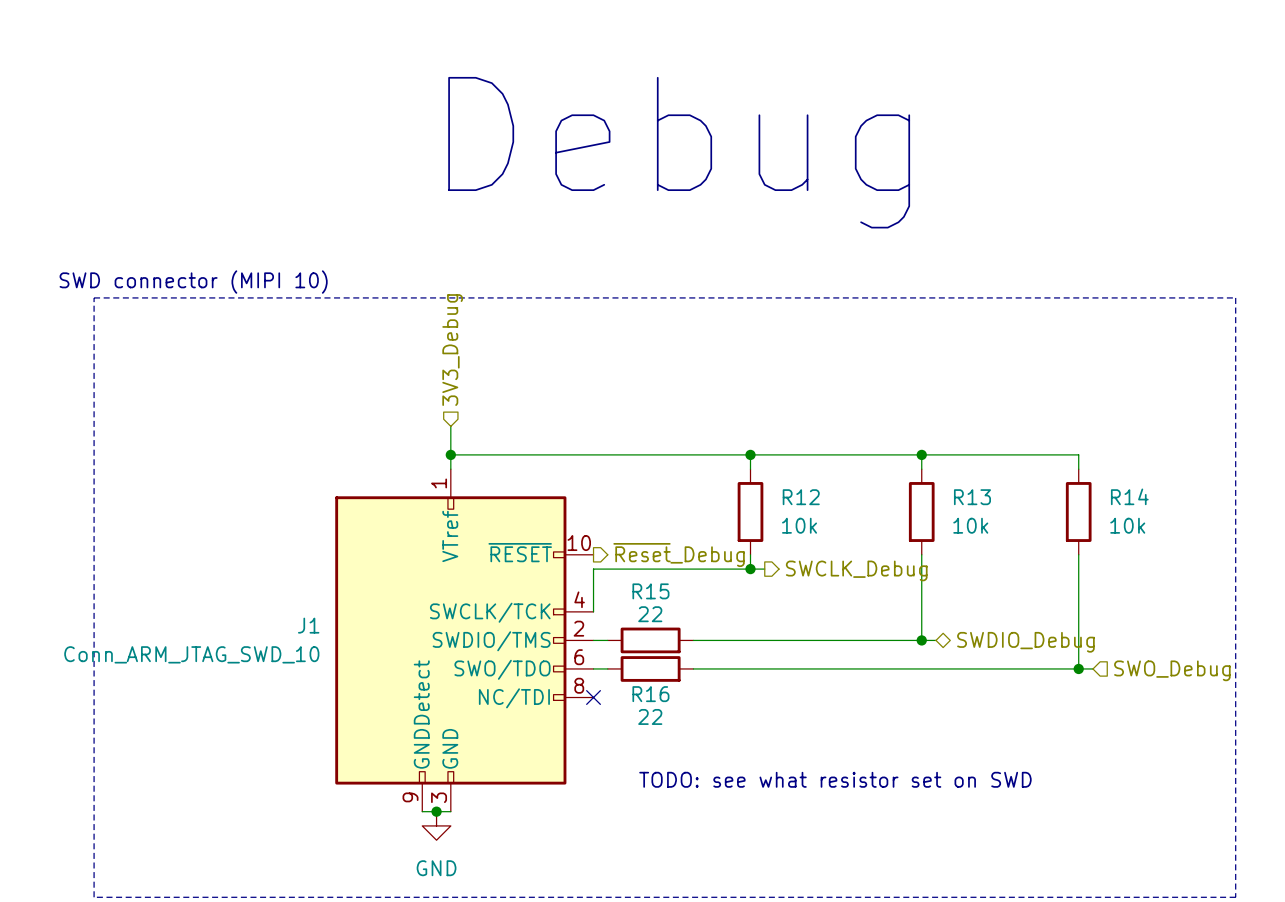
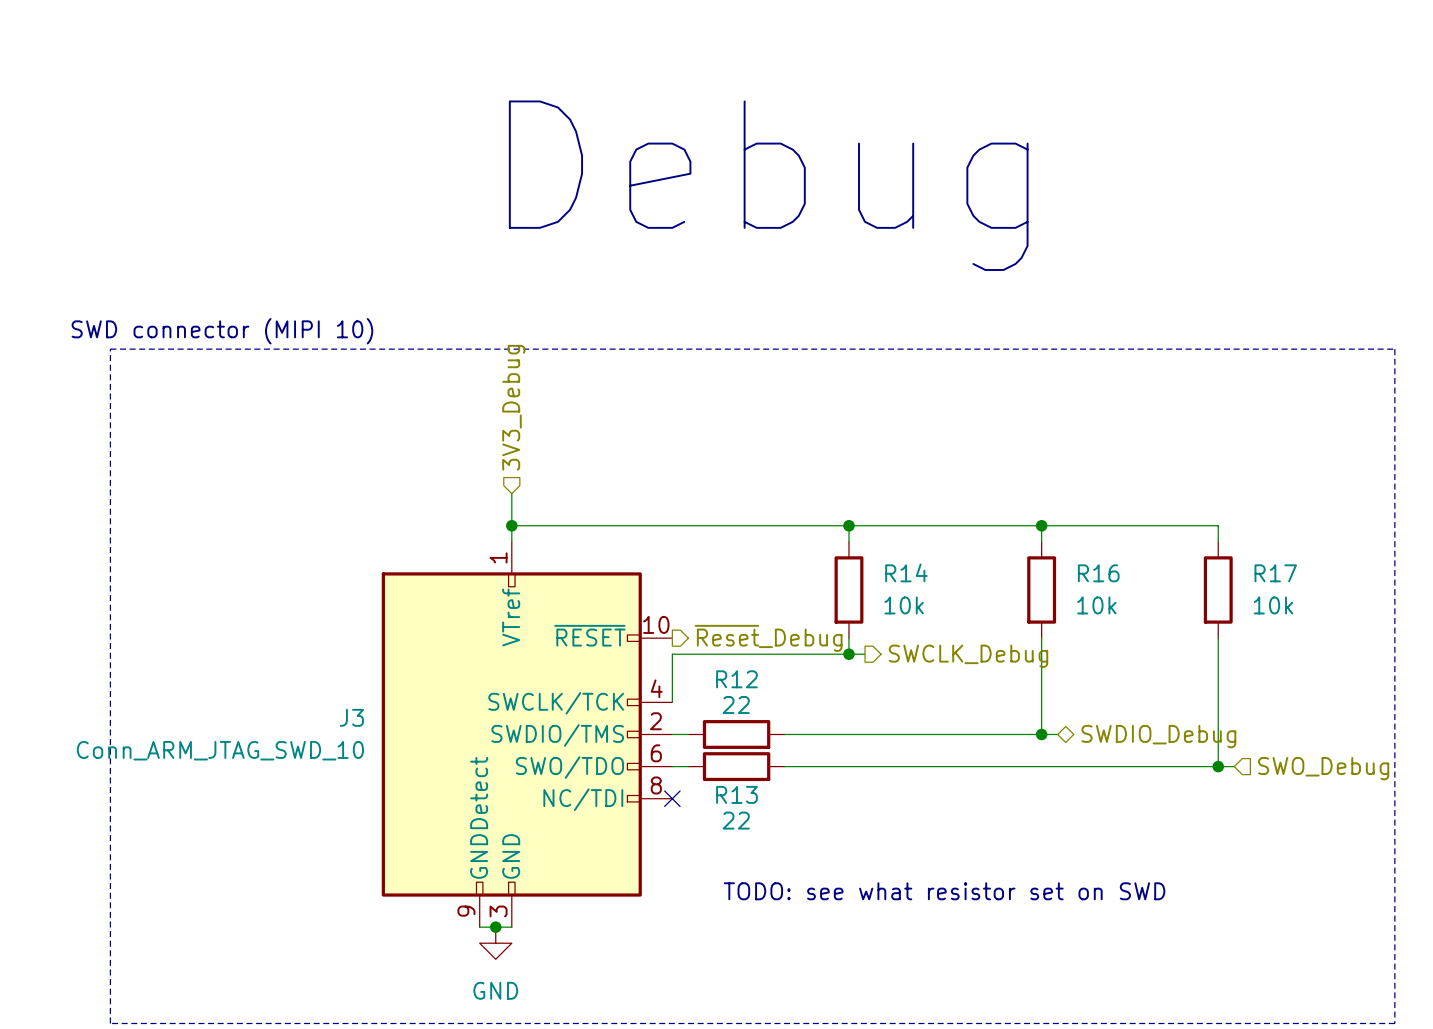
R14 name: R14 (1129, 496) -> R17 (1275, 573)
R12 name: R12 (801, 497) -> R14 (906, 572)
R13 name: R13 (972, 497) -> R16 (1098, 573)
R15 name: R15 (650, 591) -> R12 (736, 679)
J1 name: J1 (308, 625) -> J3 (351, 717)
R16 name: R16 (650, 694) -> R13 (736, 794)

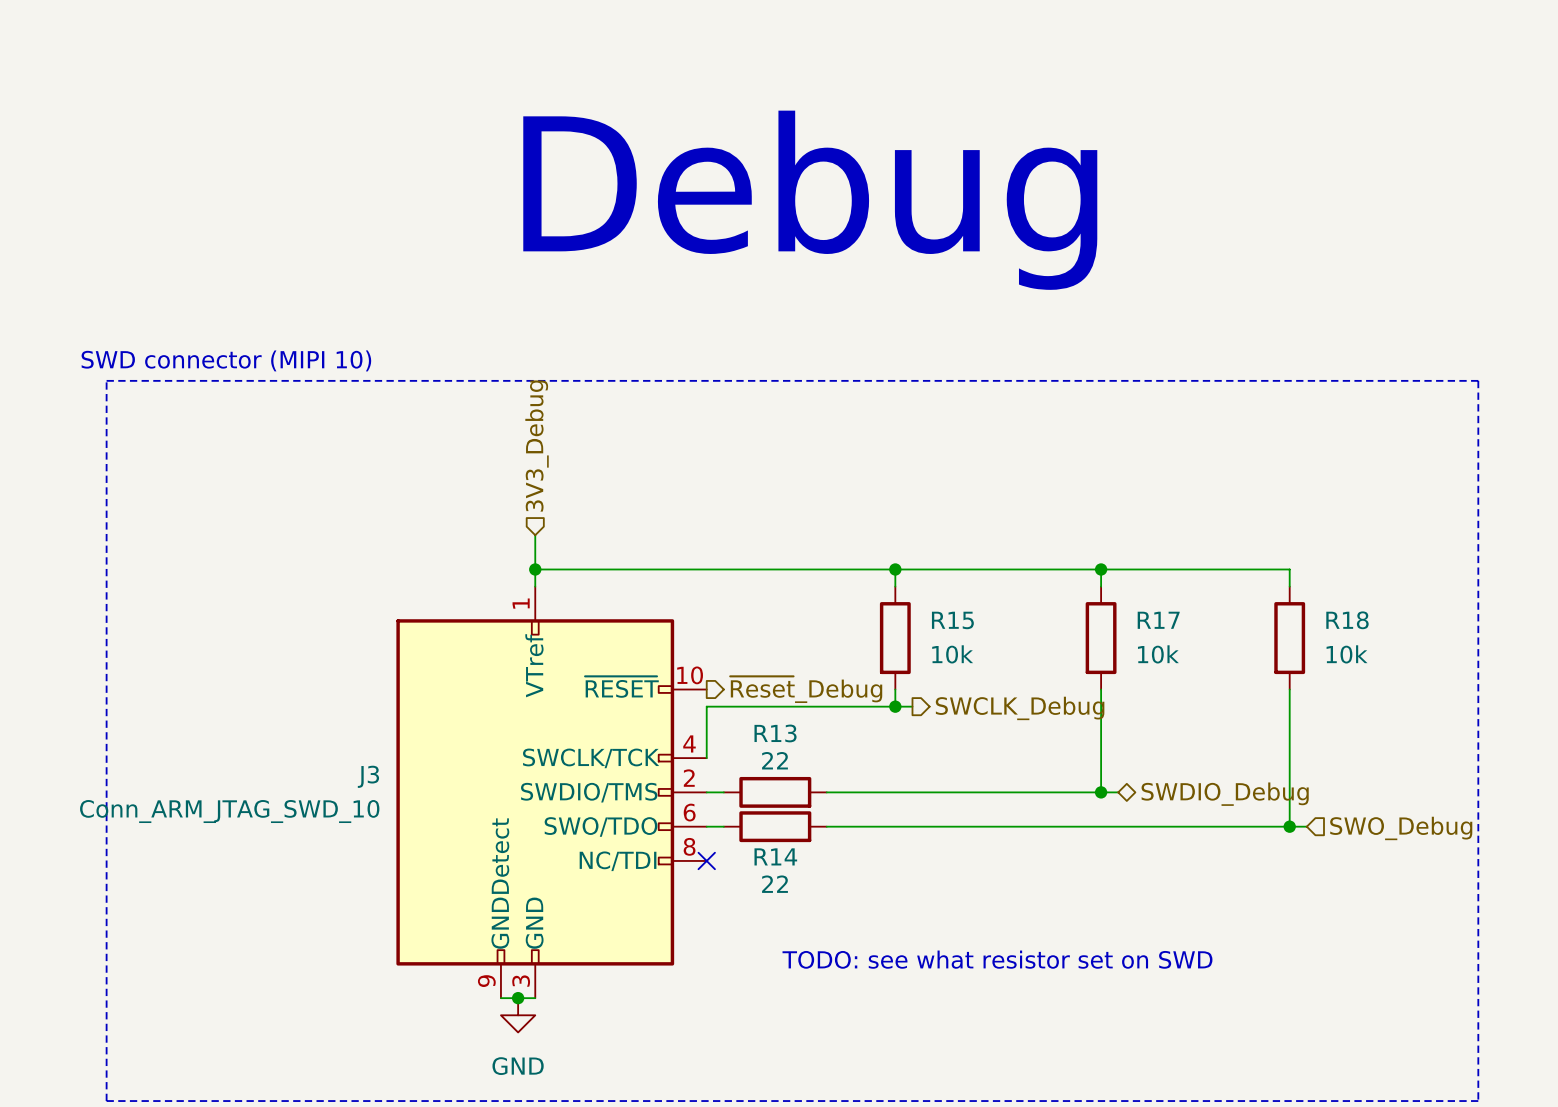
R14 name: R14 (906, 572) -> R15 (952, 620)
R16 name: R16 (1098, 573) -> R17 (1158, 620)
R17 name: R17 (1275, 573) -> R18 (1347, 620)
R12 name: R12 (736, 679) -> R13 (775, 733)
R13 name: R13 (736, 794) -> R14 (775, 856)

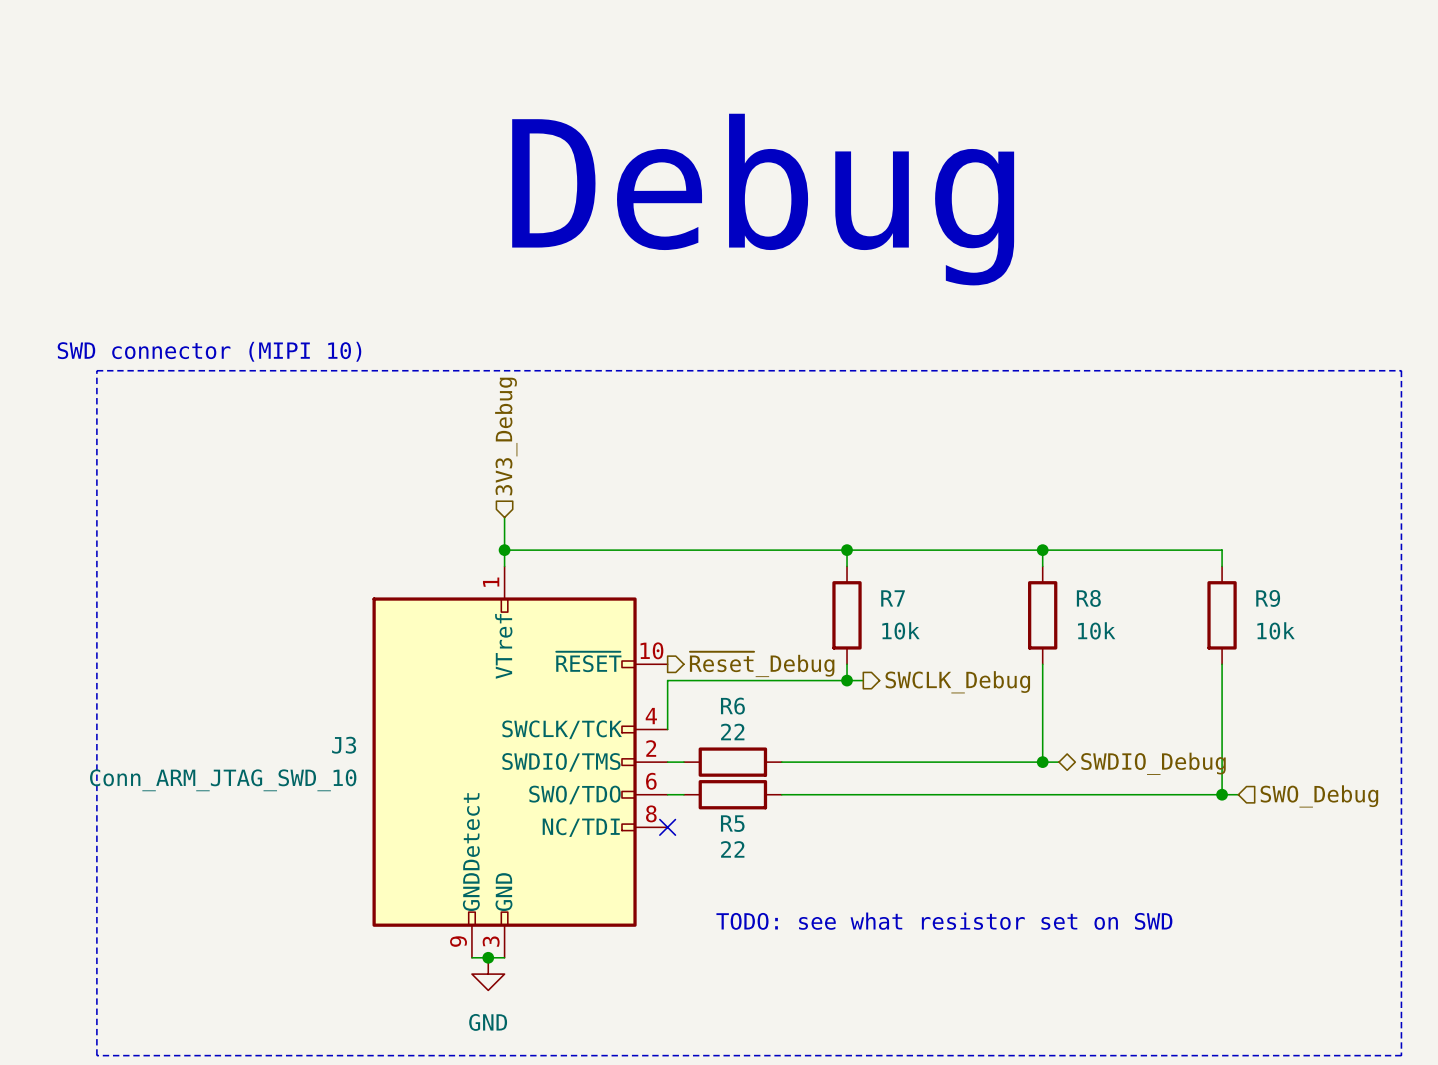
R15 name: R15 (952, 620) -> R7 (893, 598)
R17 name: R17 (1158, 620) -> R8 (1088, 598)
R18 name: R18 (1347, 620) -> R9 (1268, 598)
R13 name: R13 (775, 733) -> R6 (732, 706)
R14 name: R14 (775, 856) -> R5 (732, 823)

